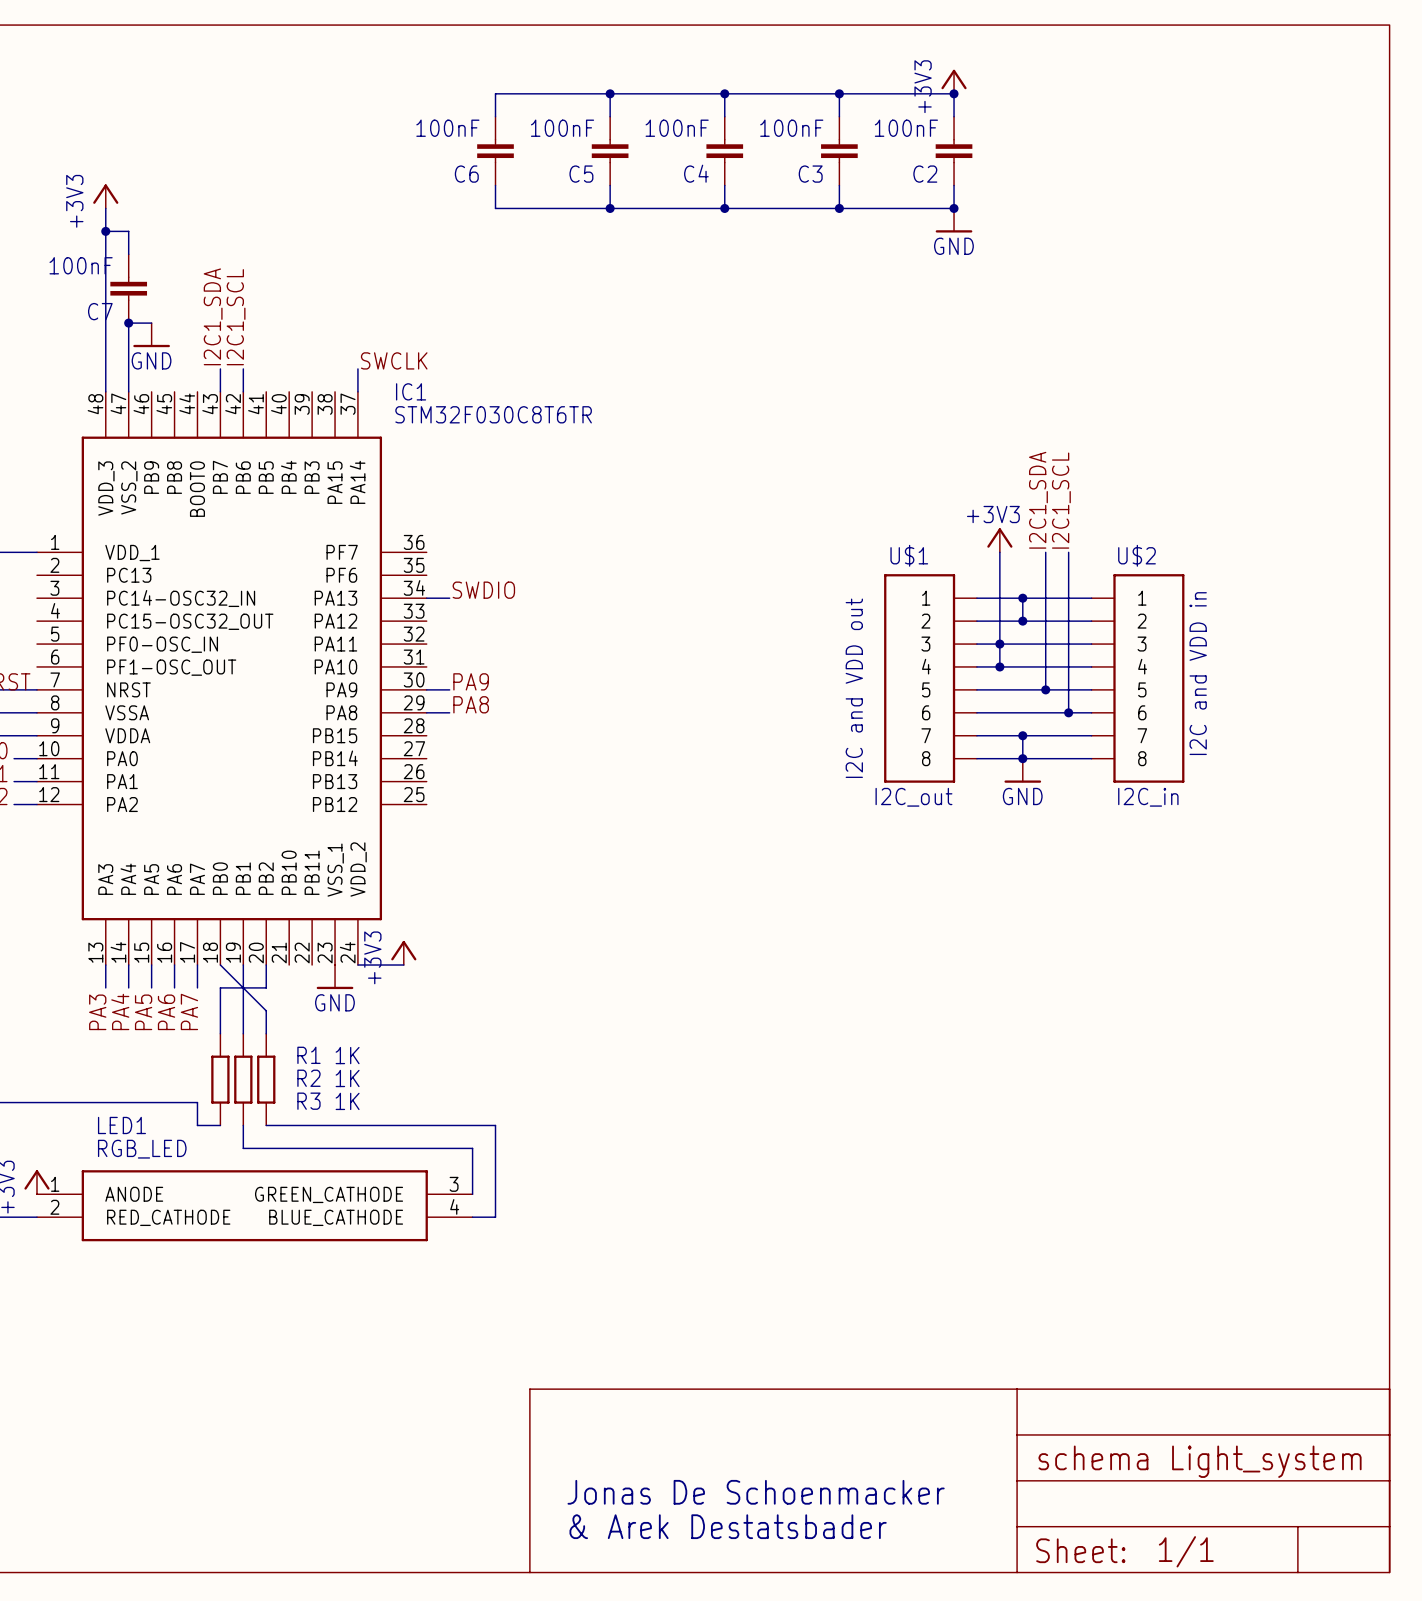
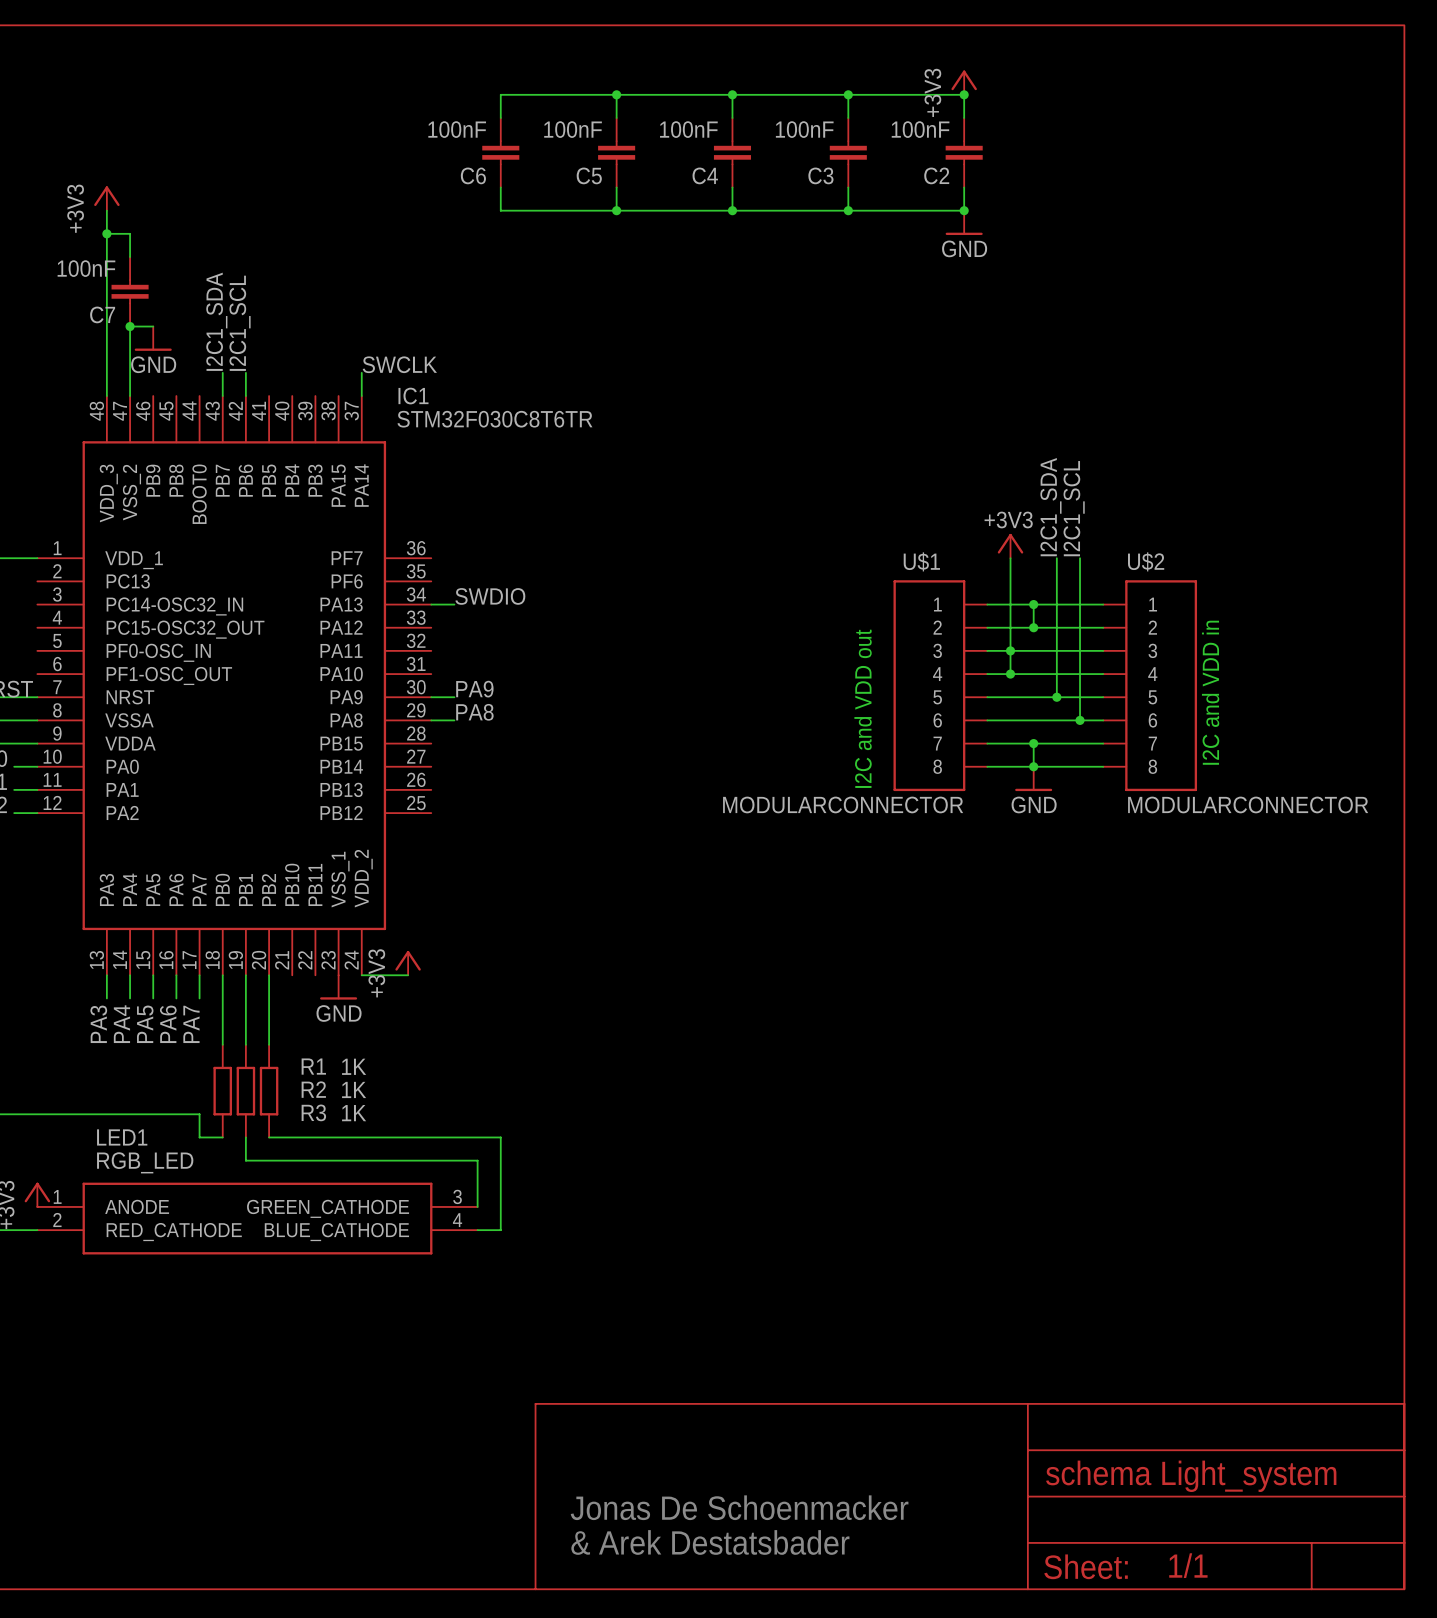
U$1 value: I2C_out (913, 797) -> MODULARCONNECTOR (843, 804)
U$2 value: I2C_in (1148, 797) -> MODULARCONNECTOR (1248, 804)
wire: (220, 965) (266, 1010) -> (222, 975) (222, 998)
wire: (220, 987) (266, 987) -> (269, 1021) (269, 998)

